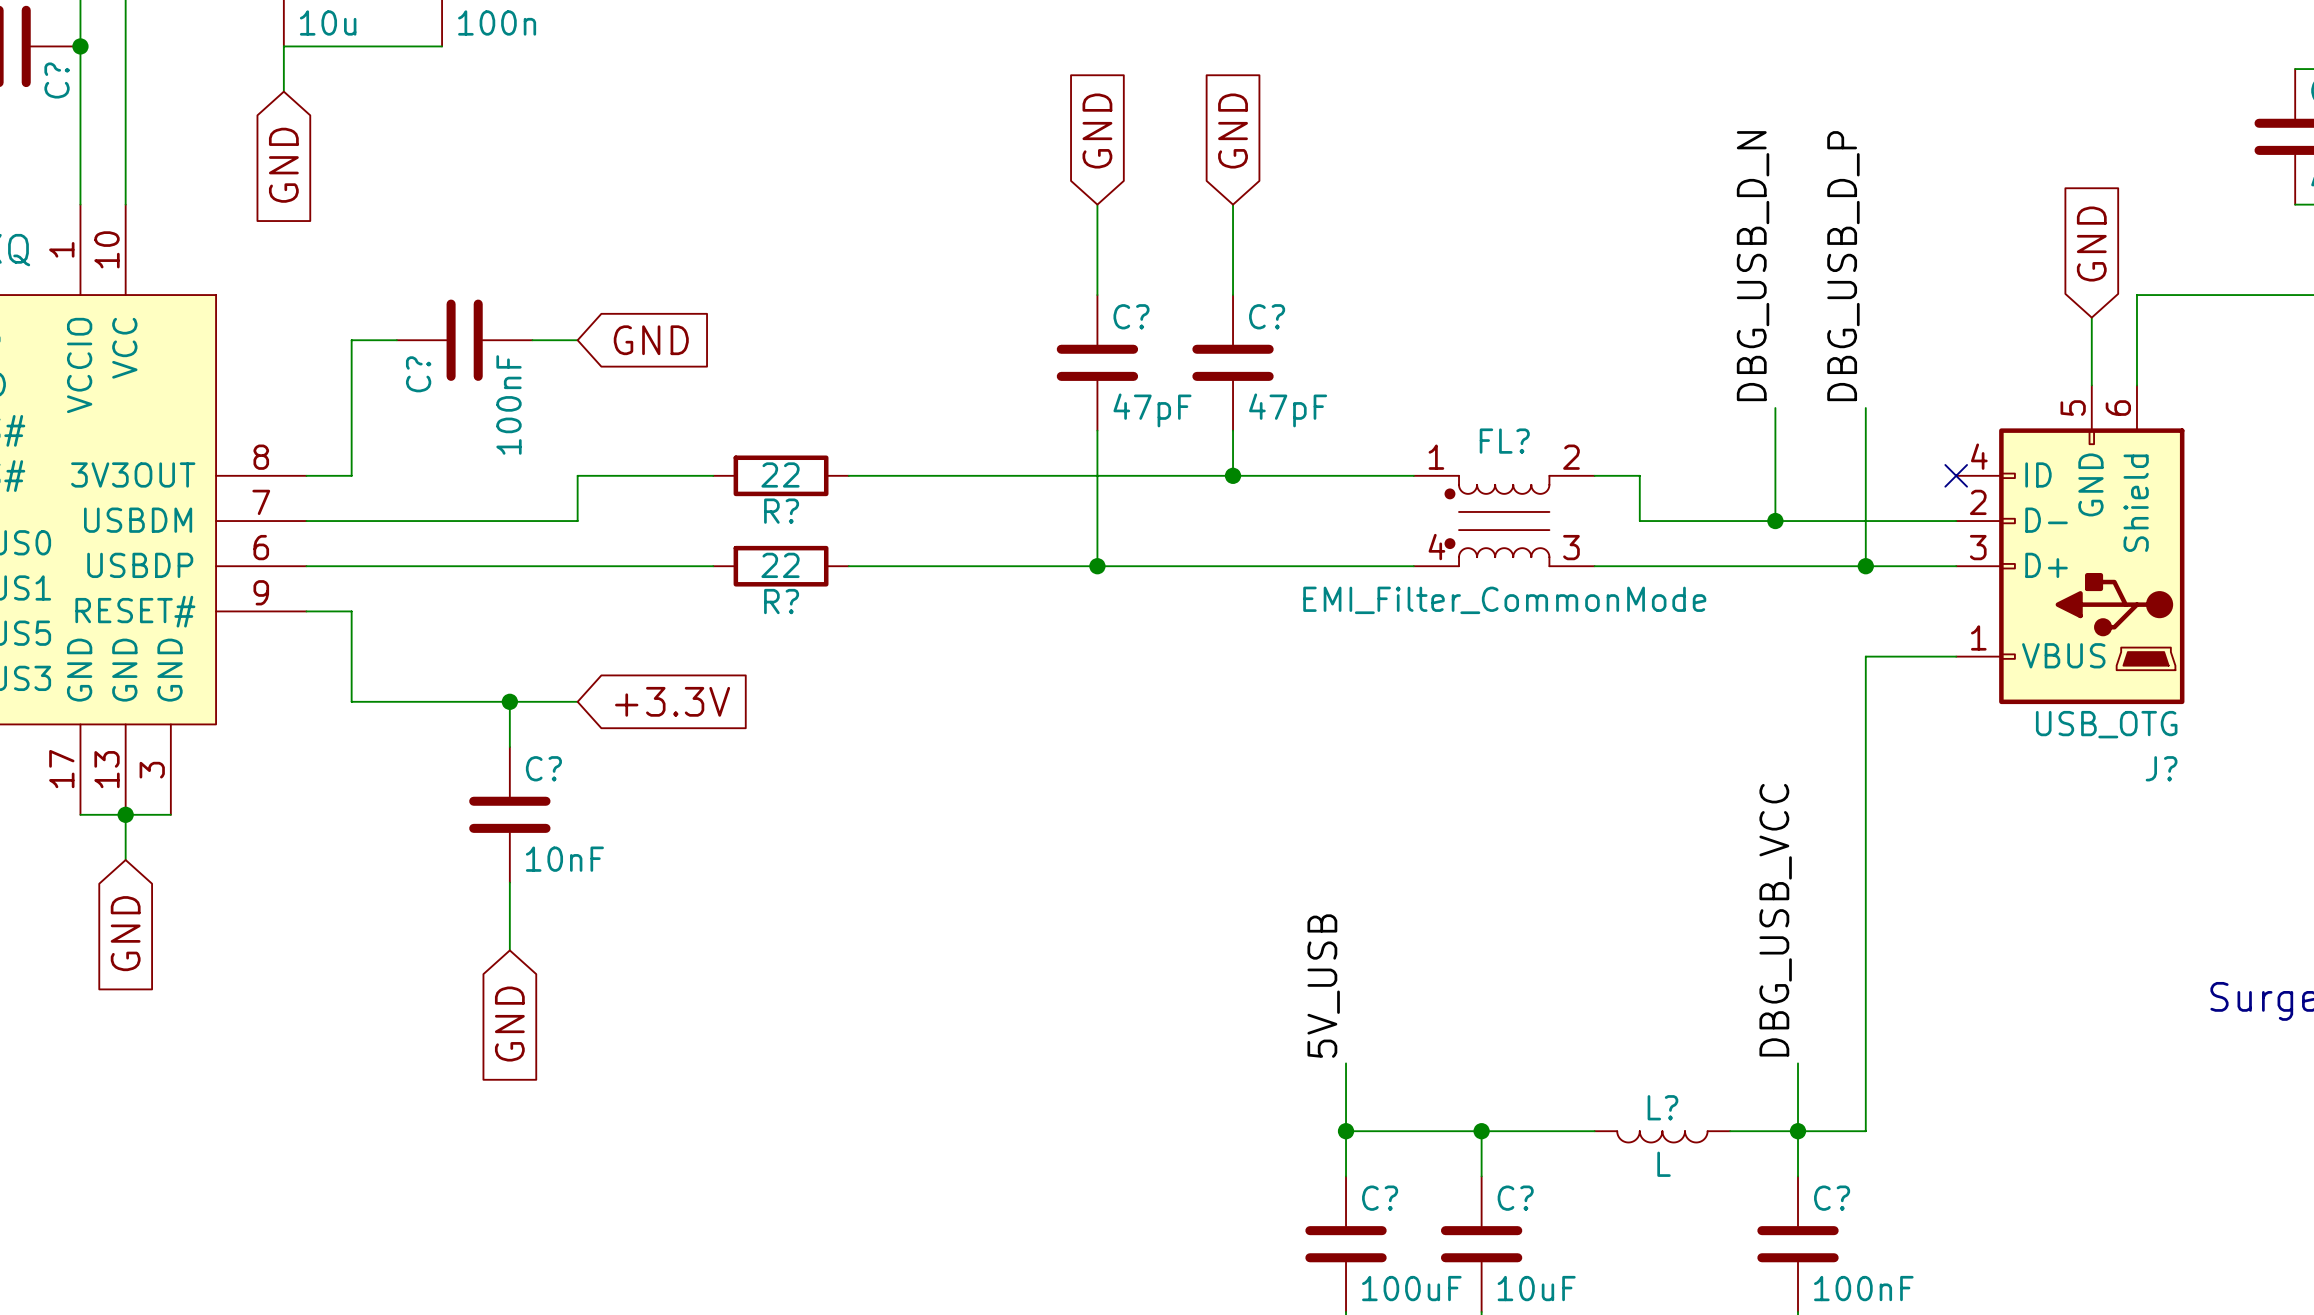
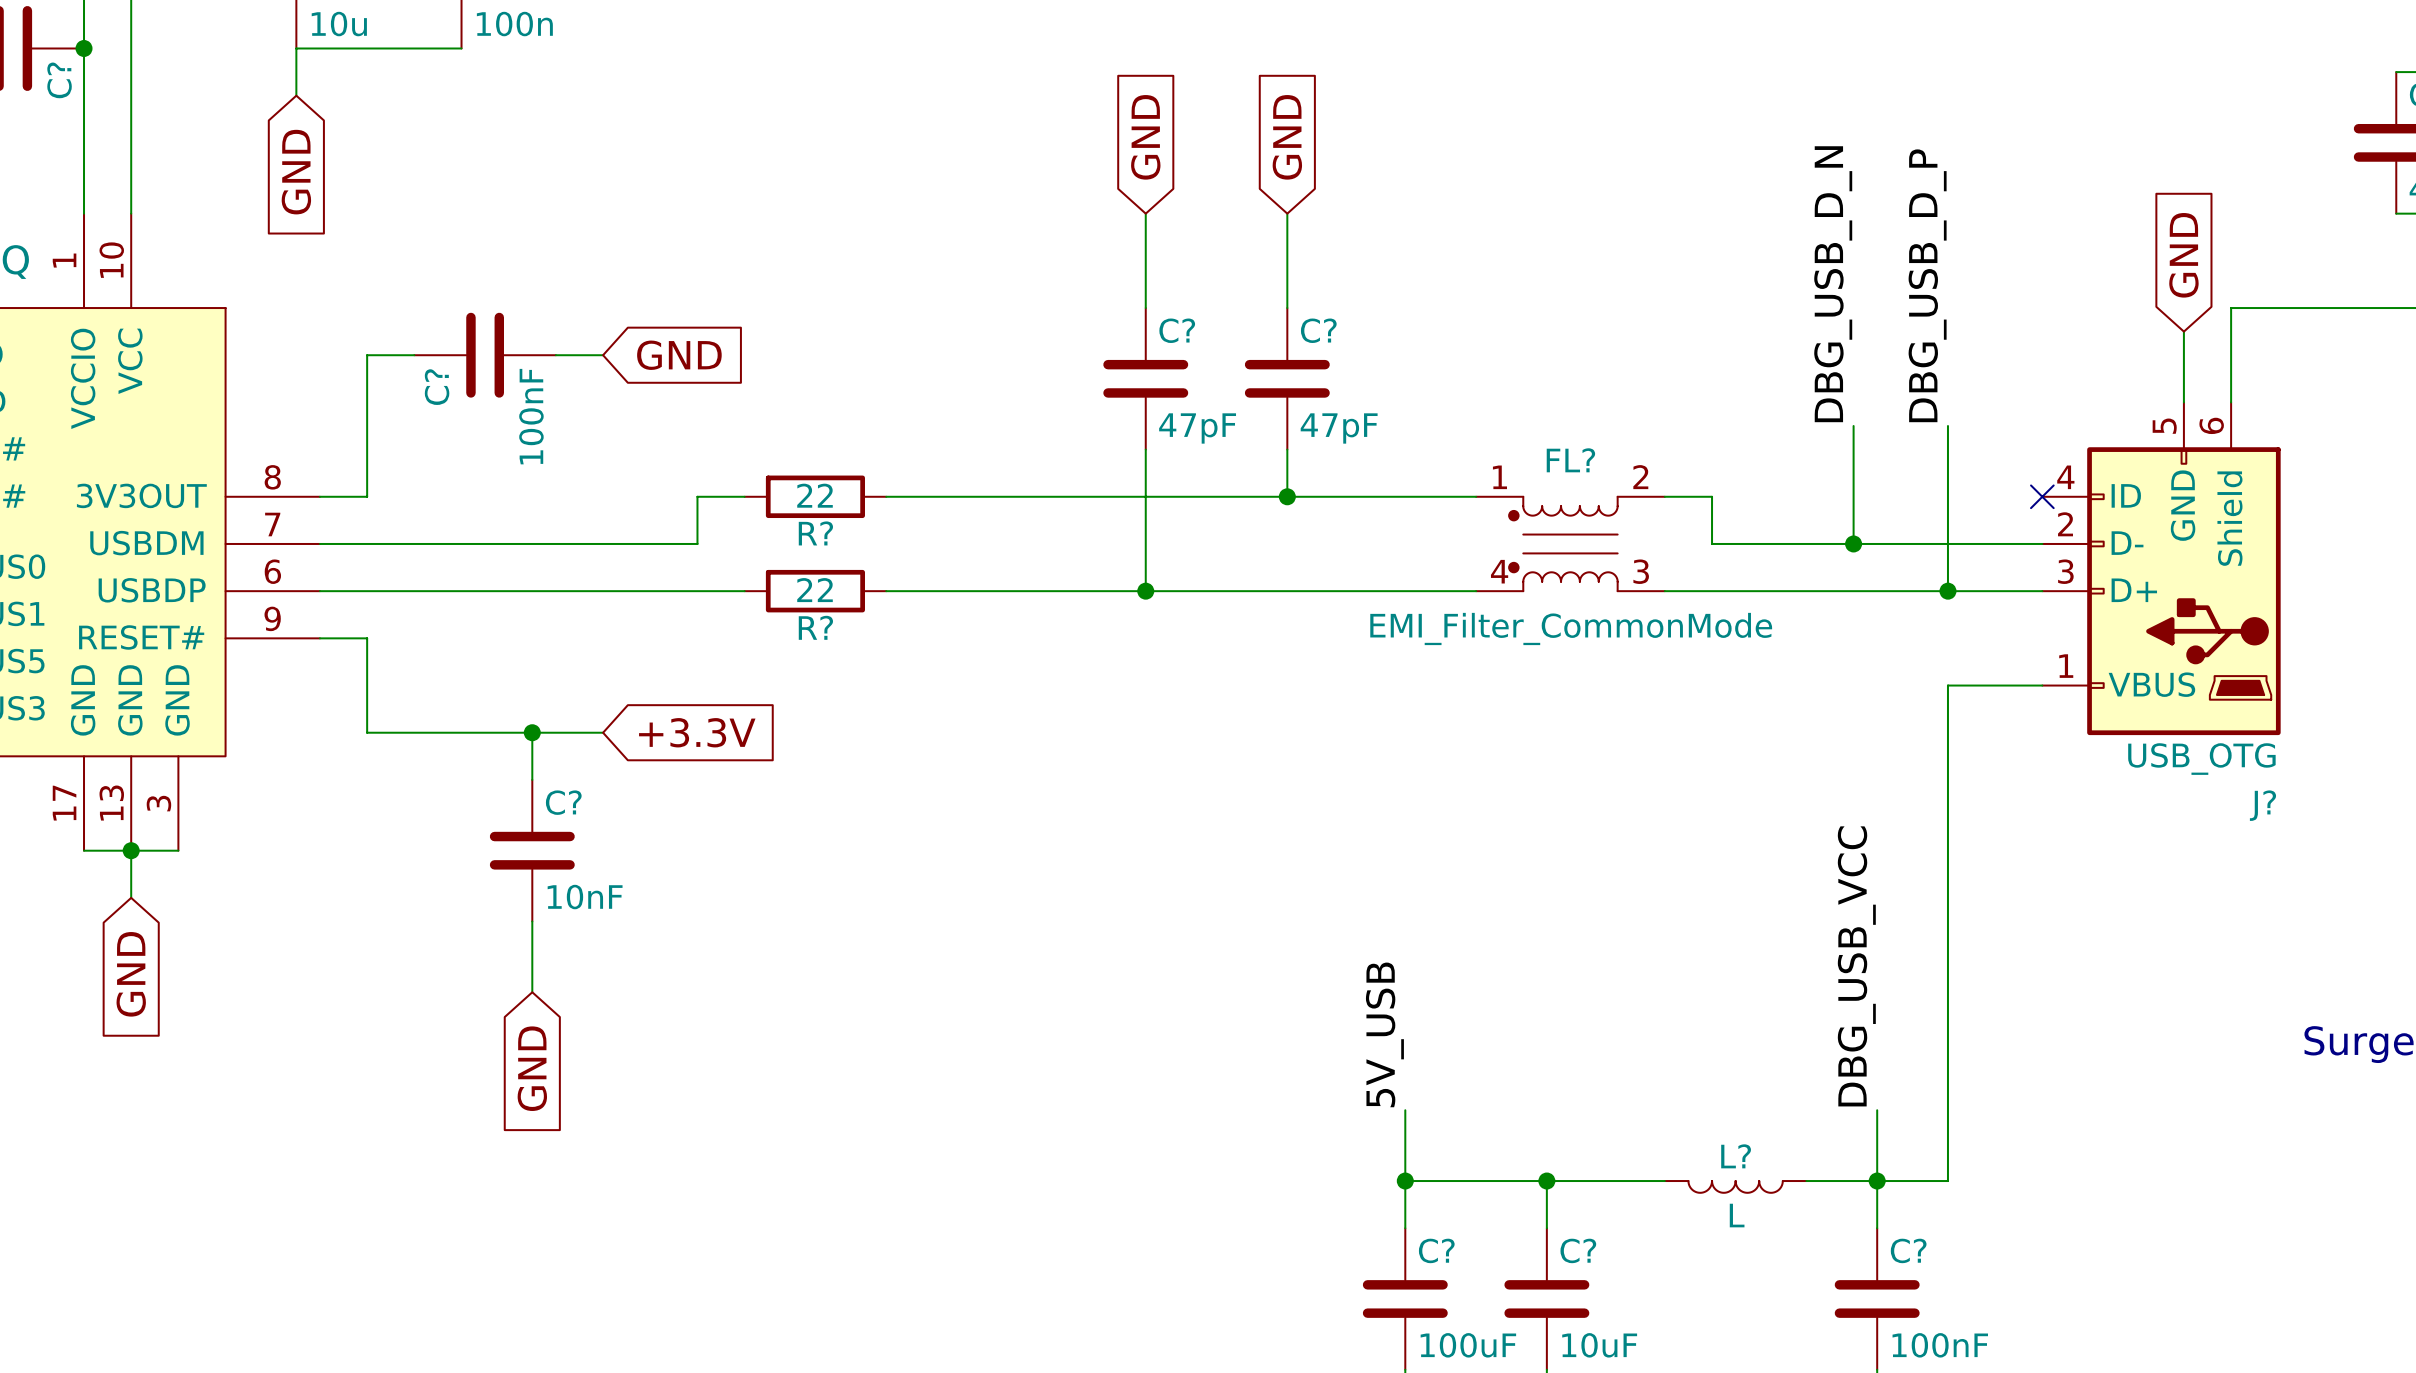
wire: (668, 475) (577, 475) (577, 521) -> (697, 496) (697, 543) (603, 543)

